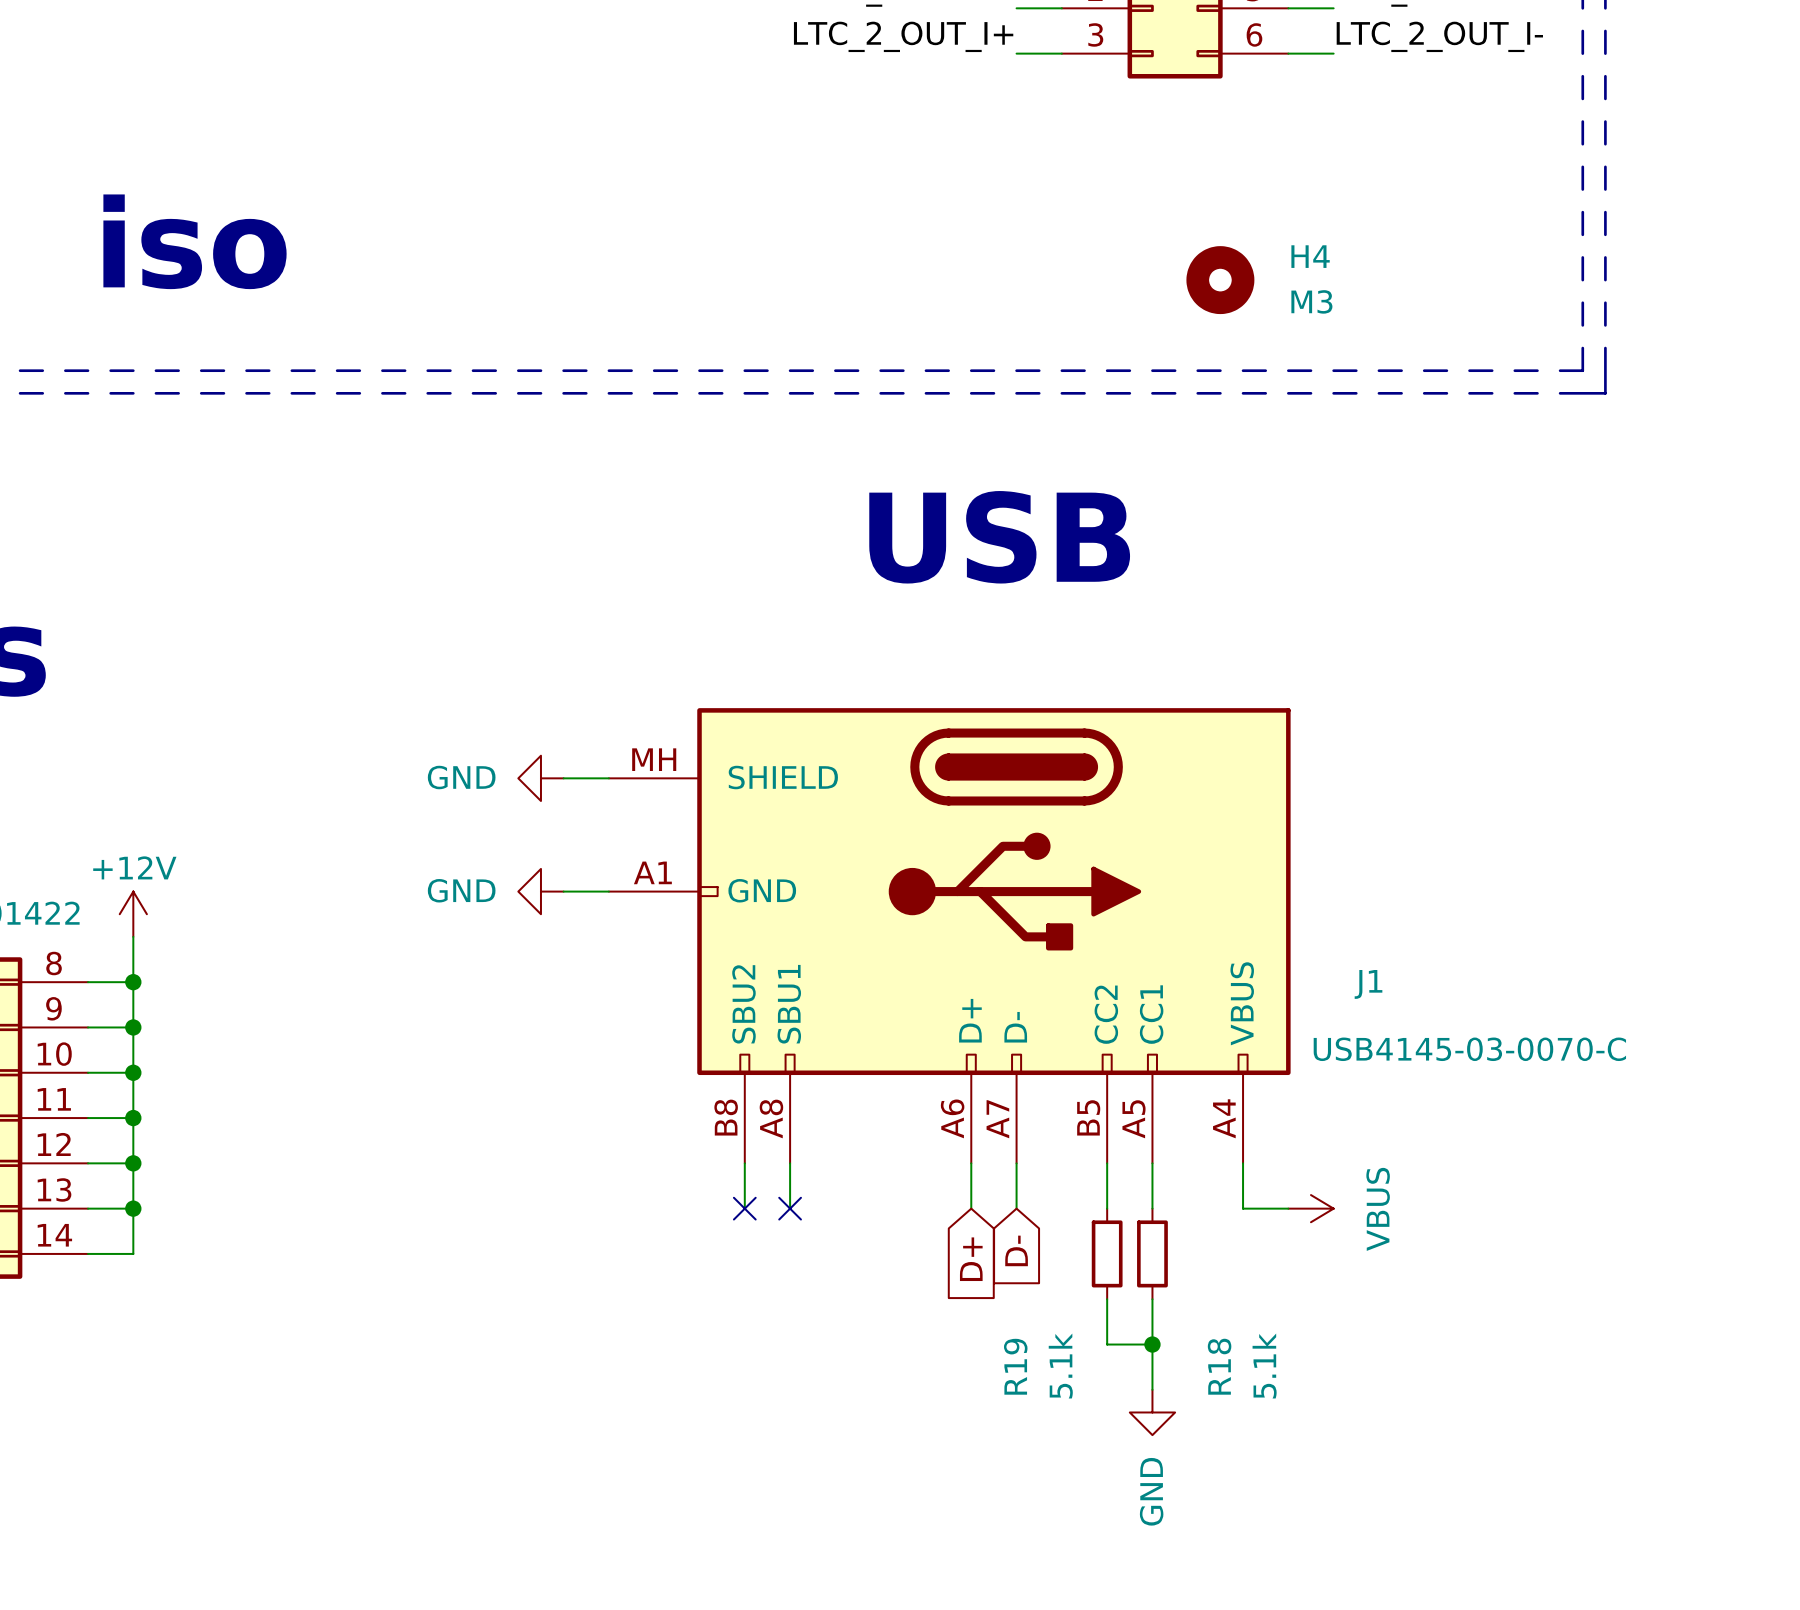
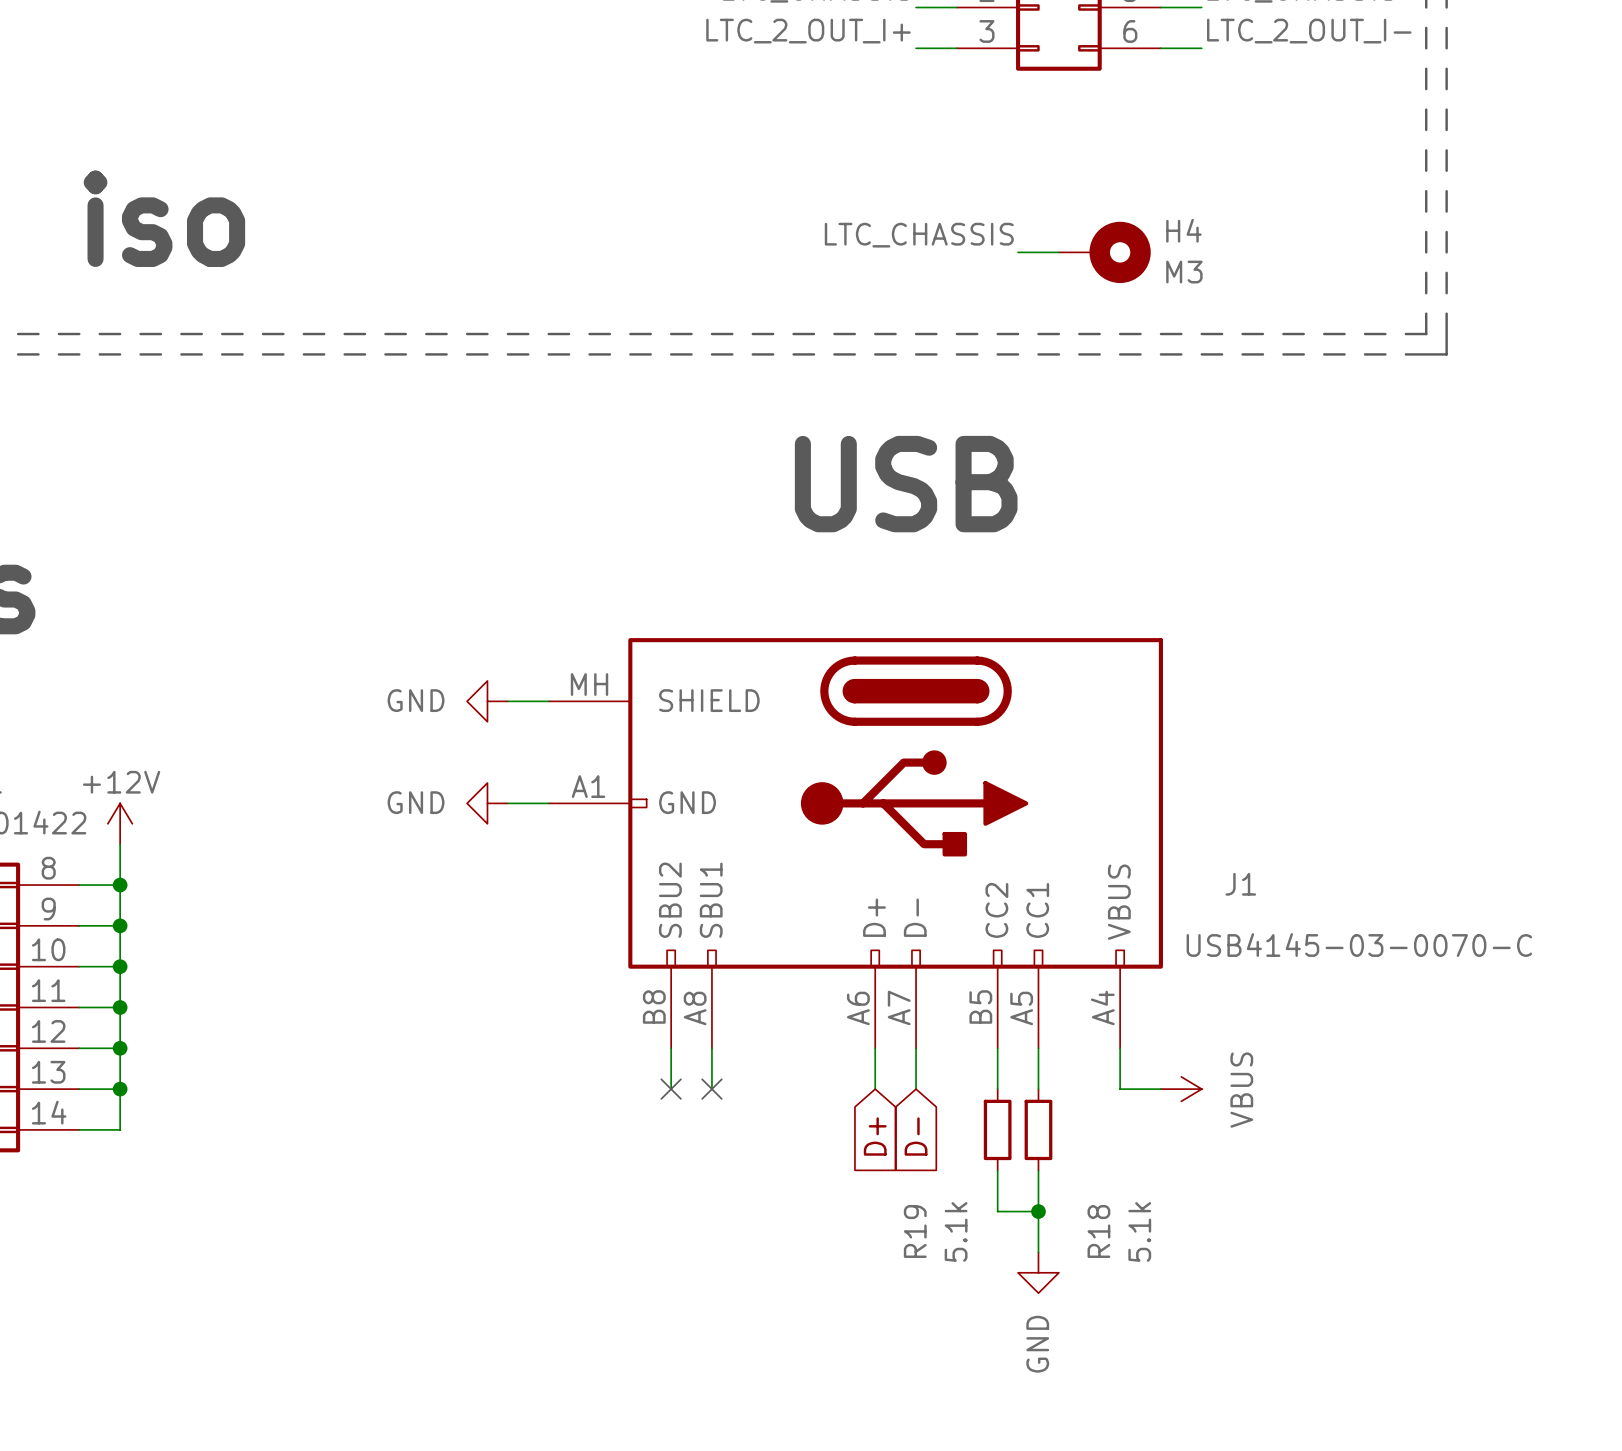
H4 symbol: [1186, 246, 1255, 315] -> [1058, 221, 1151, 284]
label: none -> LTC_CHASSIS (919, 235)
wire: none -> (1018, 252) (1058, 252)

